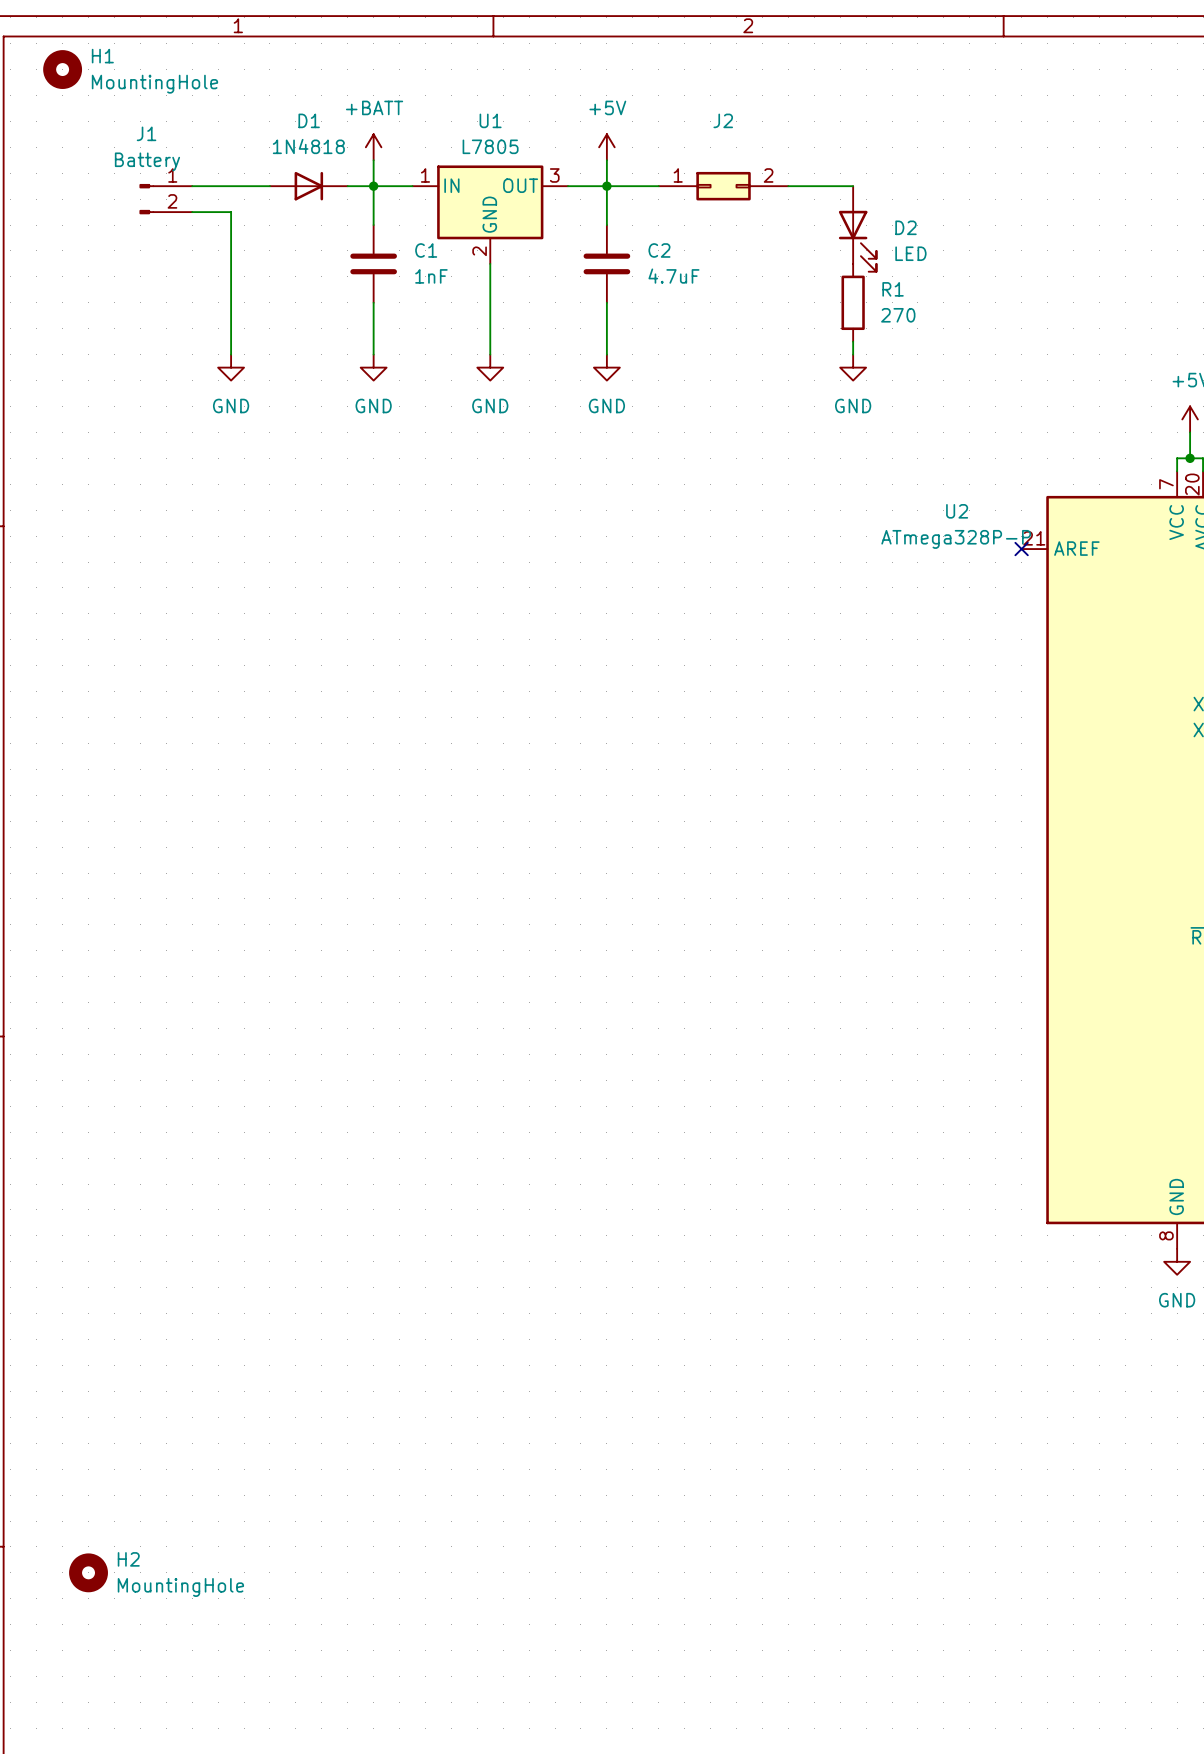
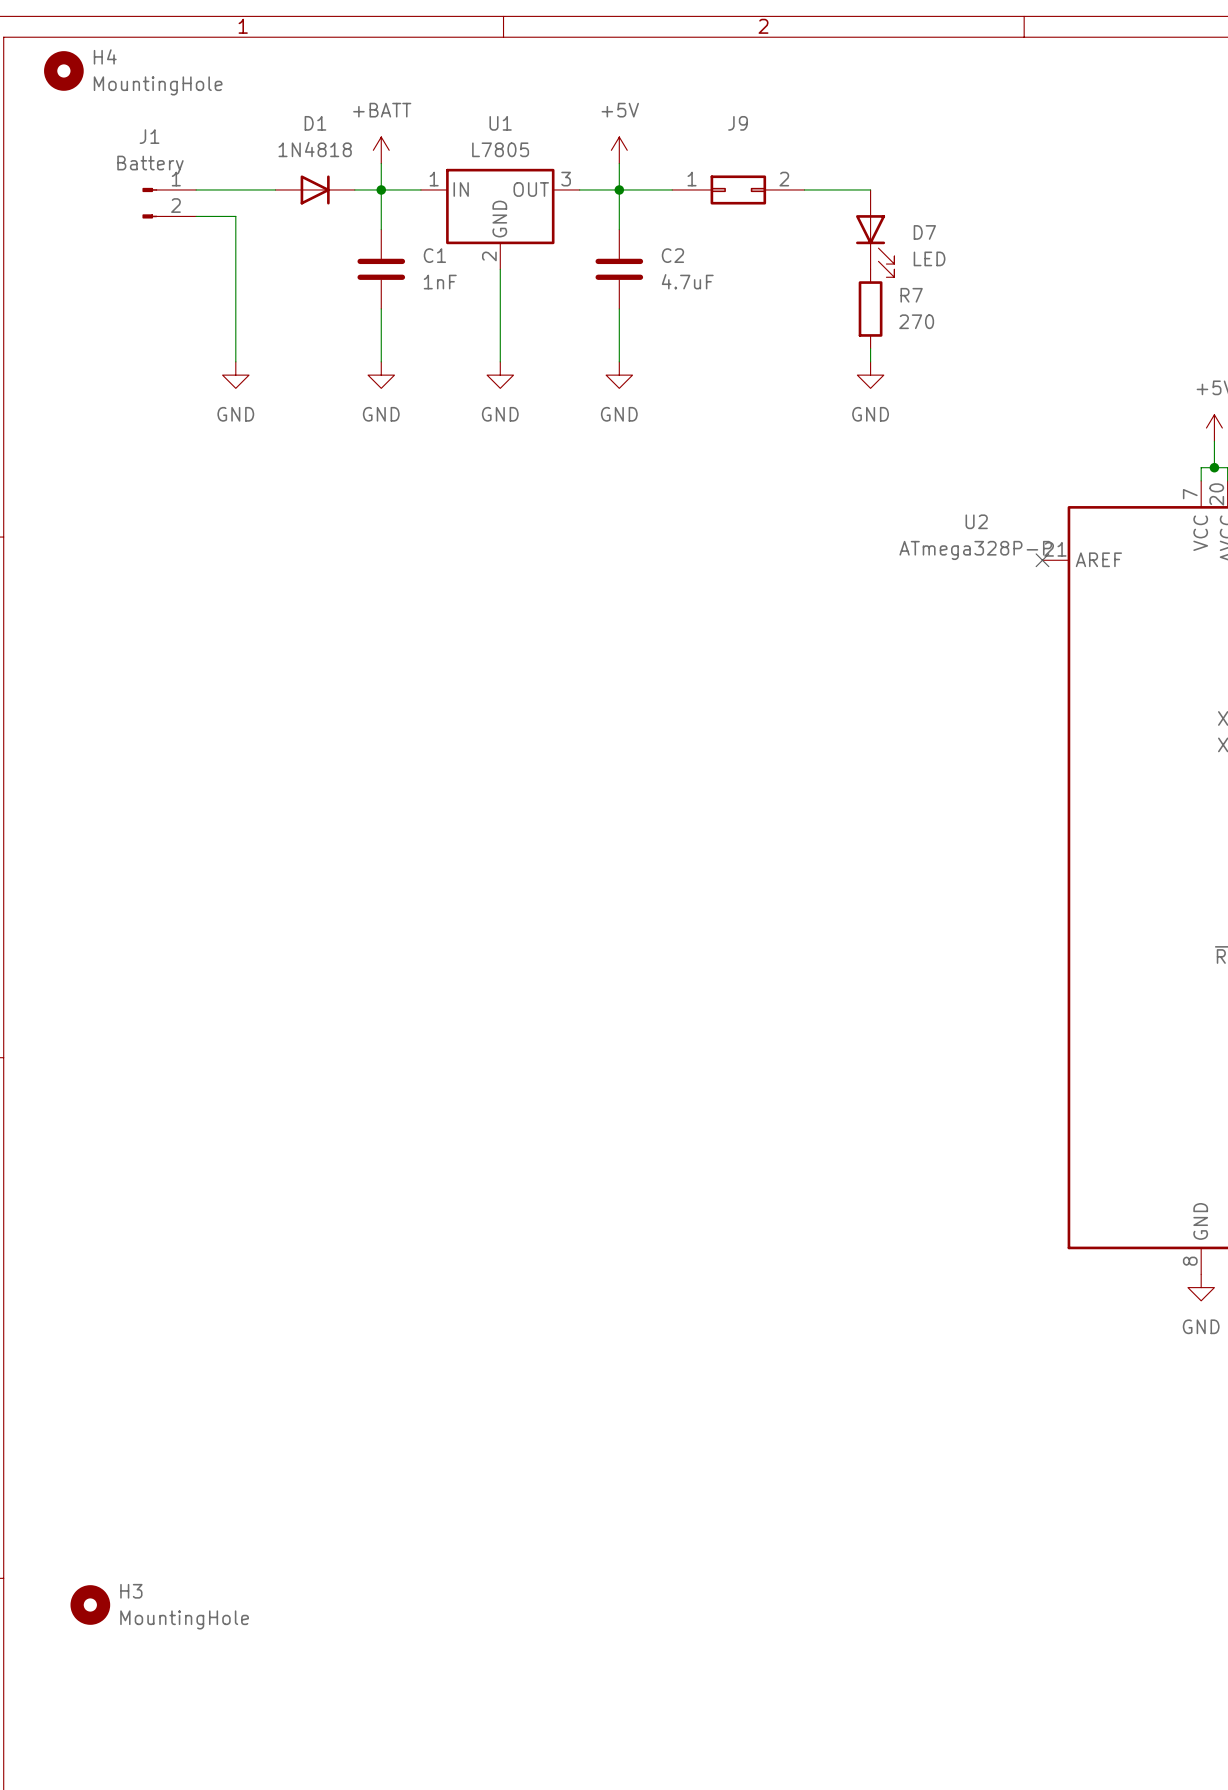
H1 name: H1 (102, 56) -> H4 (105, 56)
J2 name: J2 (723, 120) -> J9 (738, 123)
D2 name: D2 (906, 227) -> D7 (924, 232)
R1 name: R1 (893, 289) -> R7 (911, 295)
H2 name: H2 (128, 1559) -> H3 (131, 1591)

